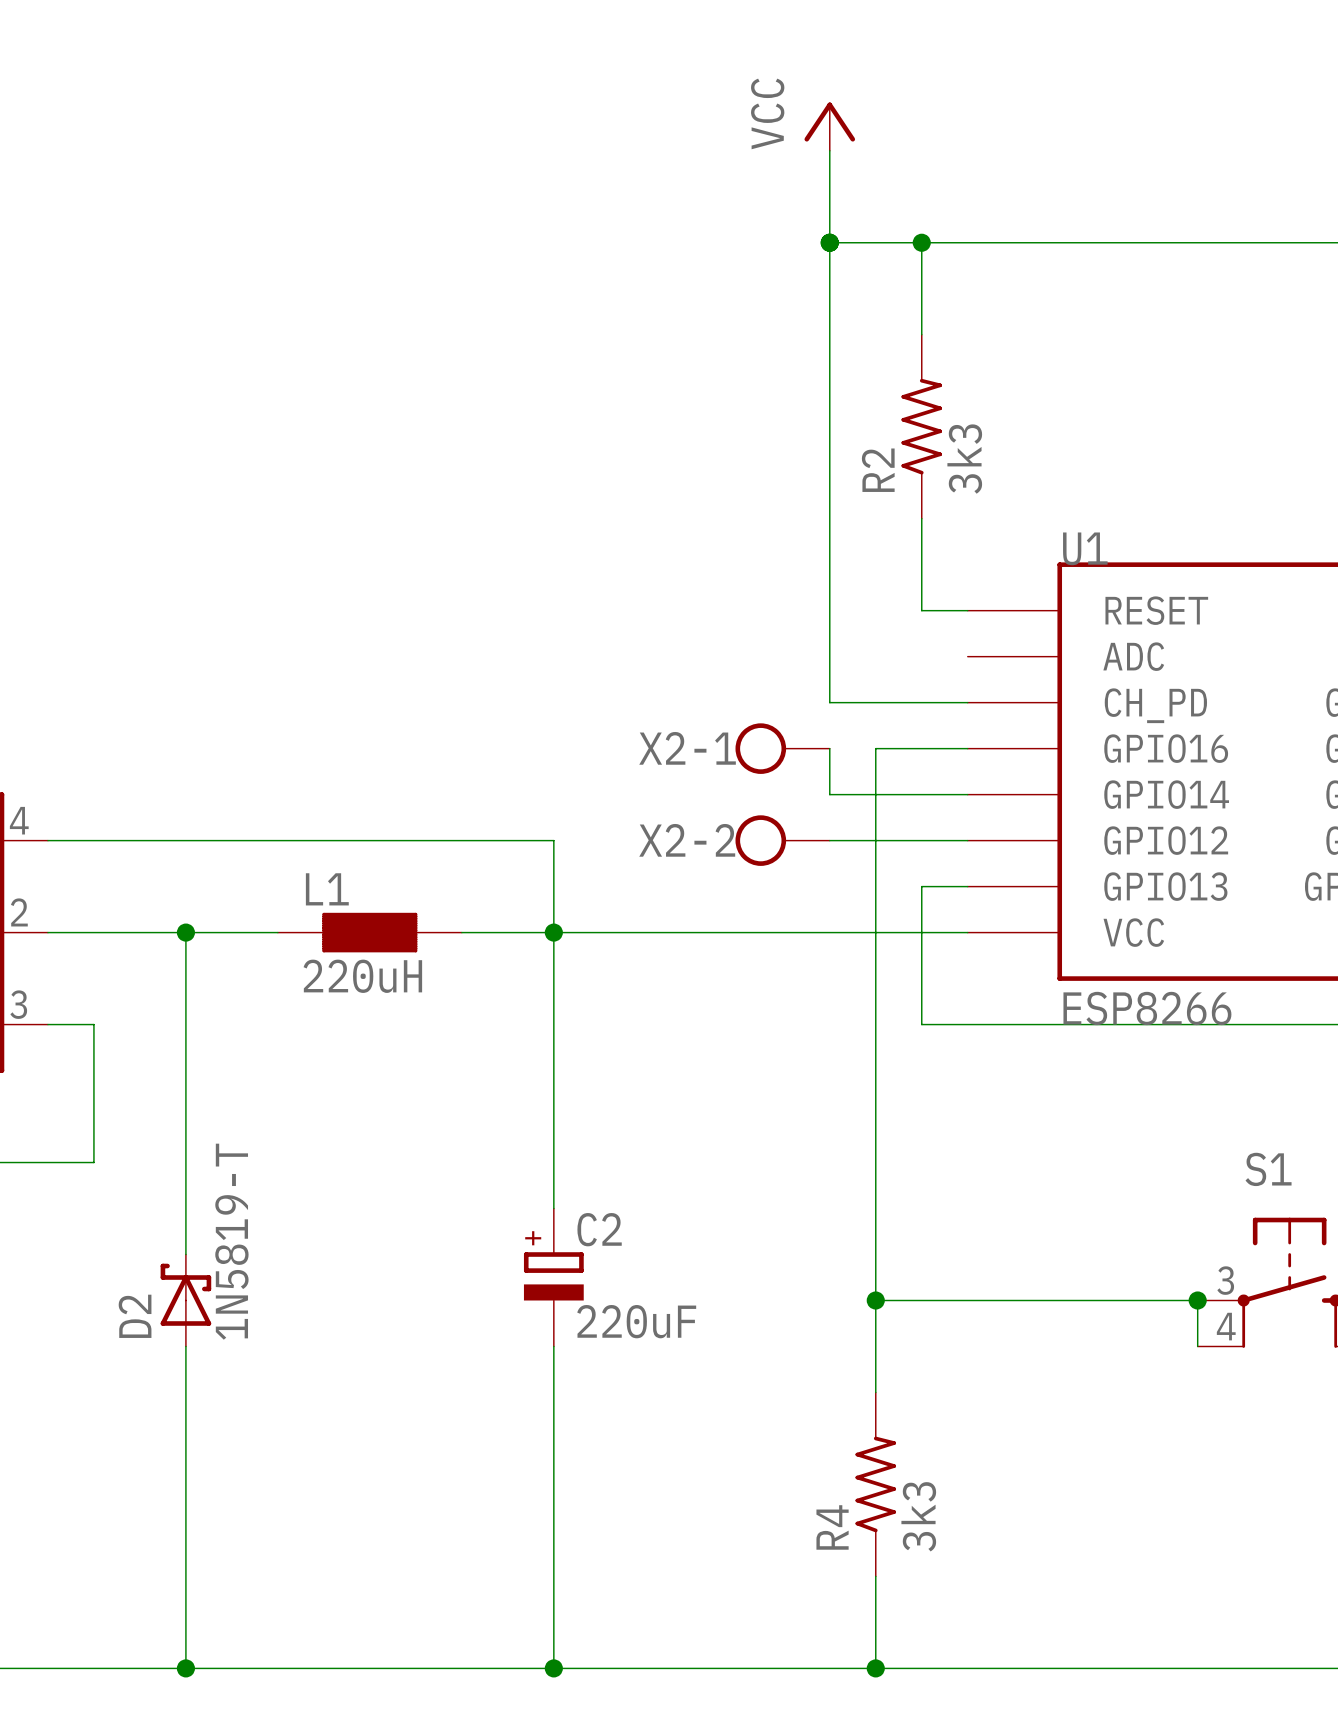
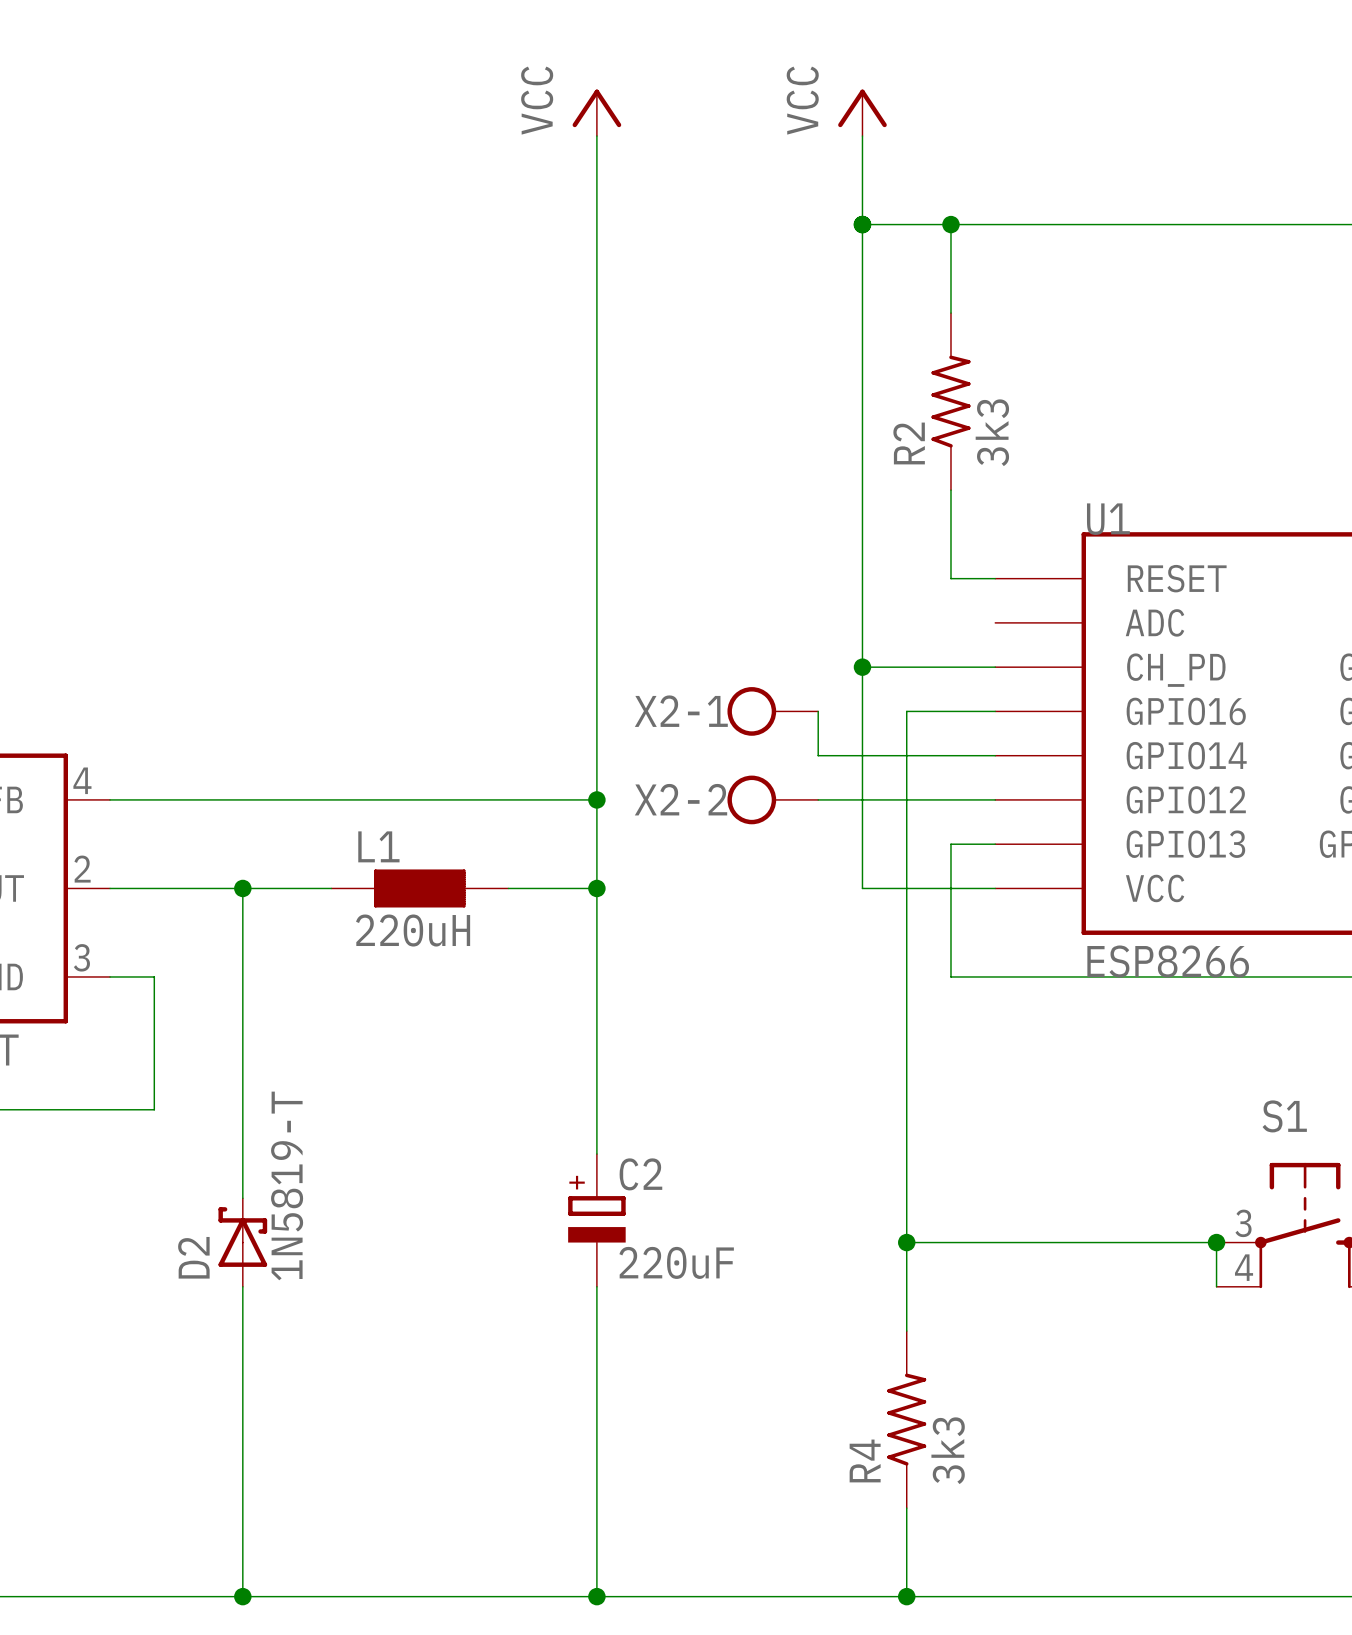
power symbol: none -> VCC (596, 112)
wire: none -> (596, 136) (596, 799)
wire: none -> (862, 667) (862, 711)
junction: none -> (862, 667)
X2-1 position: (782, 748) -> (772, 711)
junction: none -> (596, 799)
X2-2 position: (782, 840) -> (772, 799)
wire: (553, 932) (829, 932) -> (818, 711) (818, 755) (862, 755) (862, 888)

